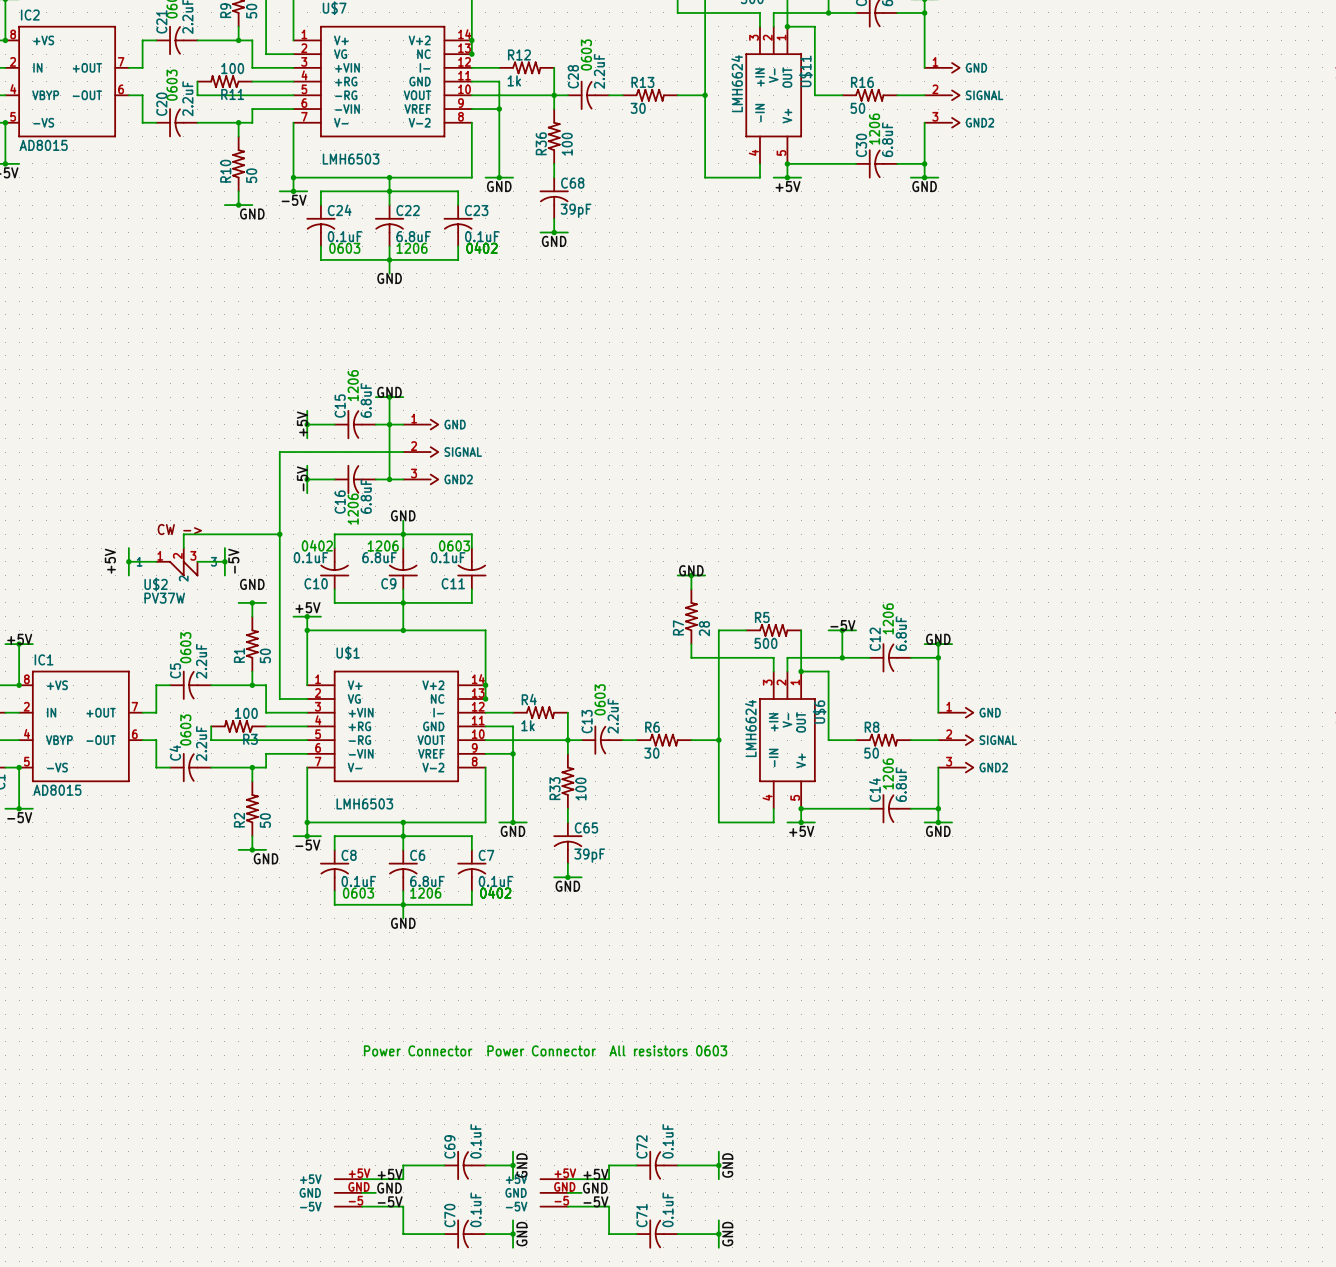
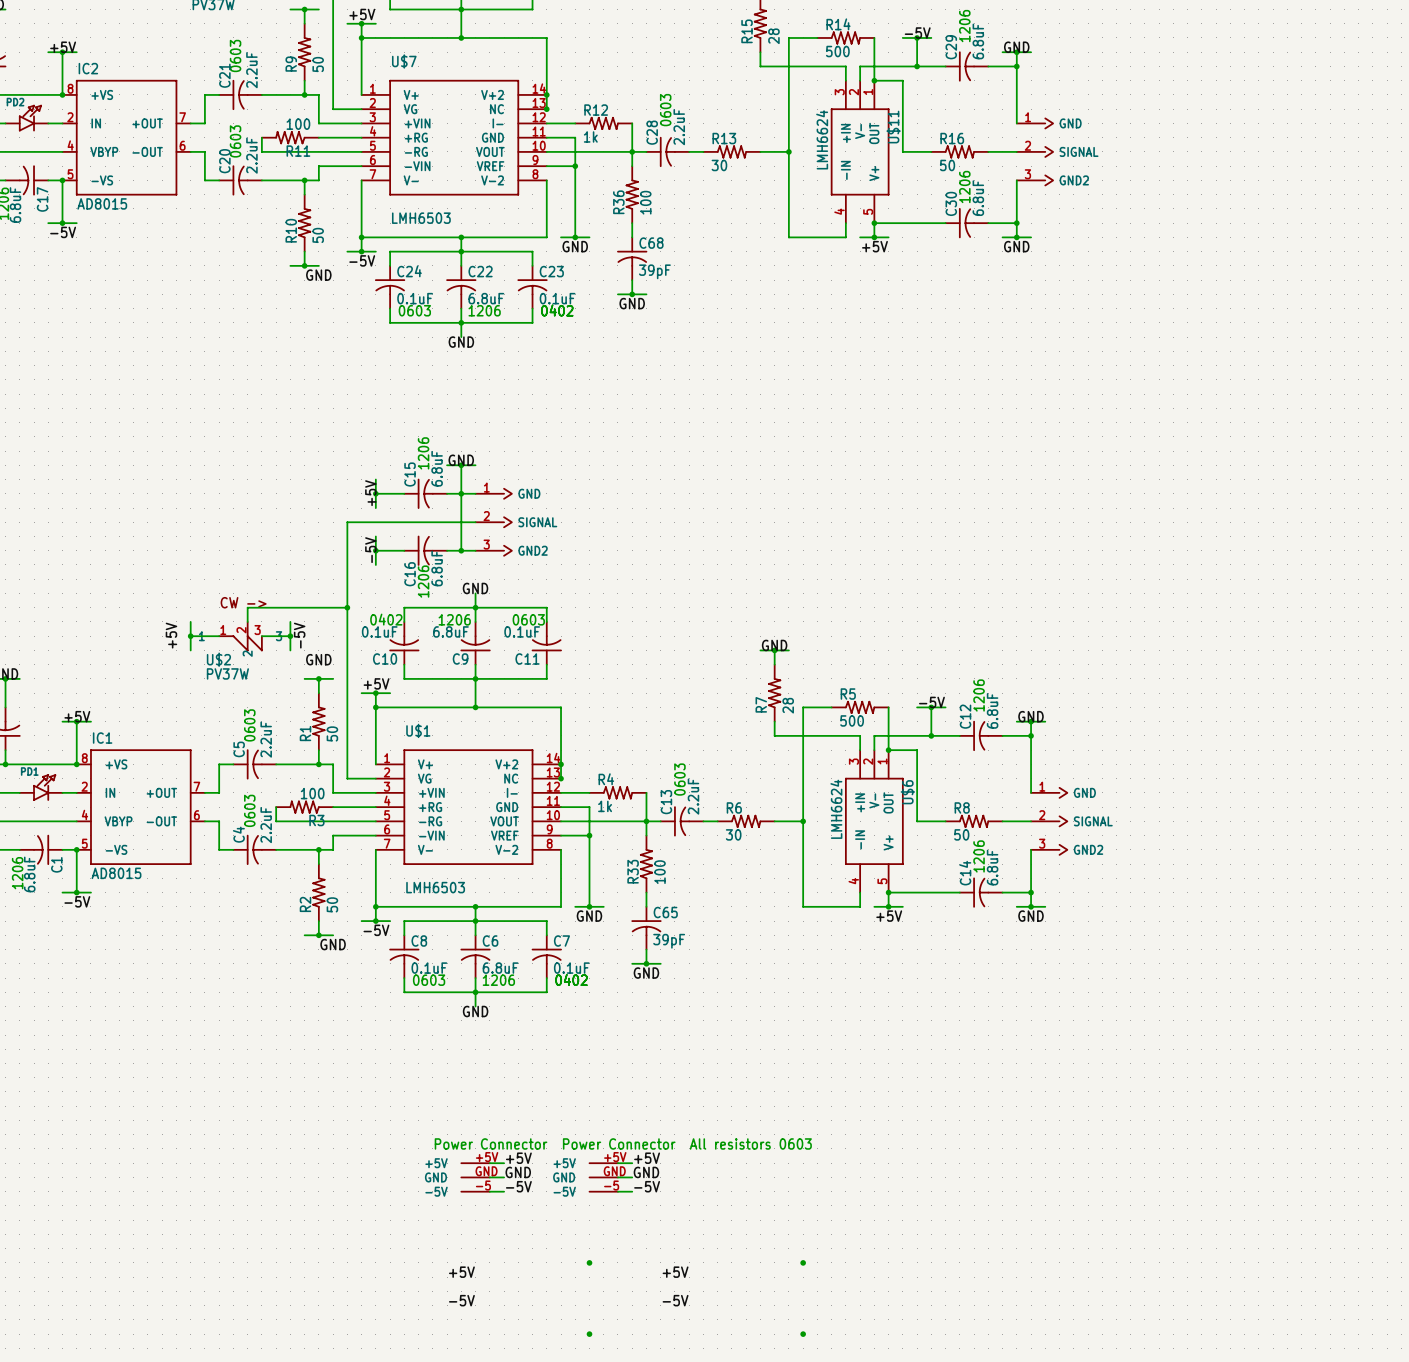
label: none -> +5V (518, 1158)
label: none -> +5V (647, 1158)
wire: none -> (489, 1163) (504, 1163)
wire: none -> (617, 1163) (632, 1163)
label: none -> GND (518, 1172)
label: none -> GND (646, 1172)
part: none -> (475, 1177)
wire: none -> (489, 1177) (504, 1177)
part: none -> (603, 1177)
wire: none -> (617, 1177) (632, 1177)
label: none -> -5V (518, 1186)
label: none -> -5V (647, 1186)
wire: (513, 1151) (513, 1179) -> none
wire: (718, 1151) (718, 1179) -> none
wire: (444, 1165) (403, 1165) (403, 1179) (362, 1179) -> none
C69: 0.1uF (465, 1165) -> none
wire: (485, 1165) (513, 1165) -> none
label: GND (521, 1165) -> none
wire: (636, 1165) (609, 1165) (609, 1179) (567, 1179) -> none
C72: 0.1uF (657, 1165) -> none
wire: (677, 1165) (718, 1165) -> none
label: GND (727, 1165) -> none
label: GND (389, 1188) -> none
label: GND (595, 1188) -> none
part: (348, 1192) -> none
wire: (362, 1192) (375, 1192) -> (489, 1191) (504, 1191)
part: (554, 1192) -> none
wire: (567, 1192) (581, 1192) -> (617, 1191) (632, 1191)
wire: (362, 1206) (403, 1206) (403, 1234) (444, 1234) -> none
wire: (567, 1206) (609, 1206) (609, 1234) (636, 1234) -> none
wire: (513, 1220) (513, 1247) -> none
wire: (718, 1220) (718, 1247) -> none
C70: 0.1uF (465, 1234) -> none
wire: (485, 1234) (513, 1234) -> none
label: GND (521, 1234) -> none
C71: 0.1uF (657, 1234) -> none
wire: (677, 1234) (718, 1234) -> none
label: GND (727, 1234) -> none

